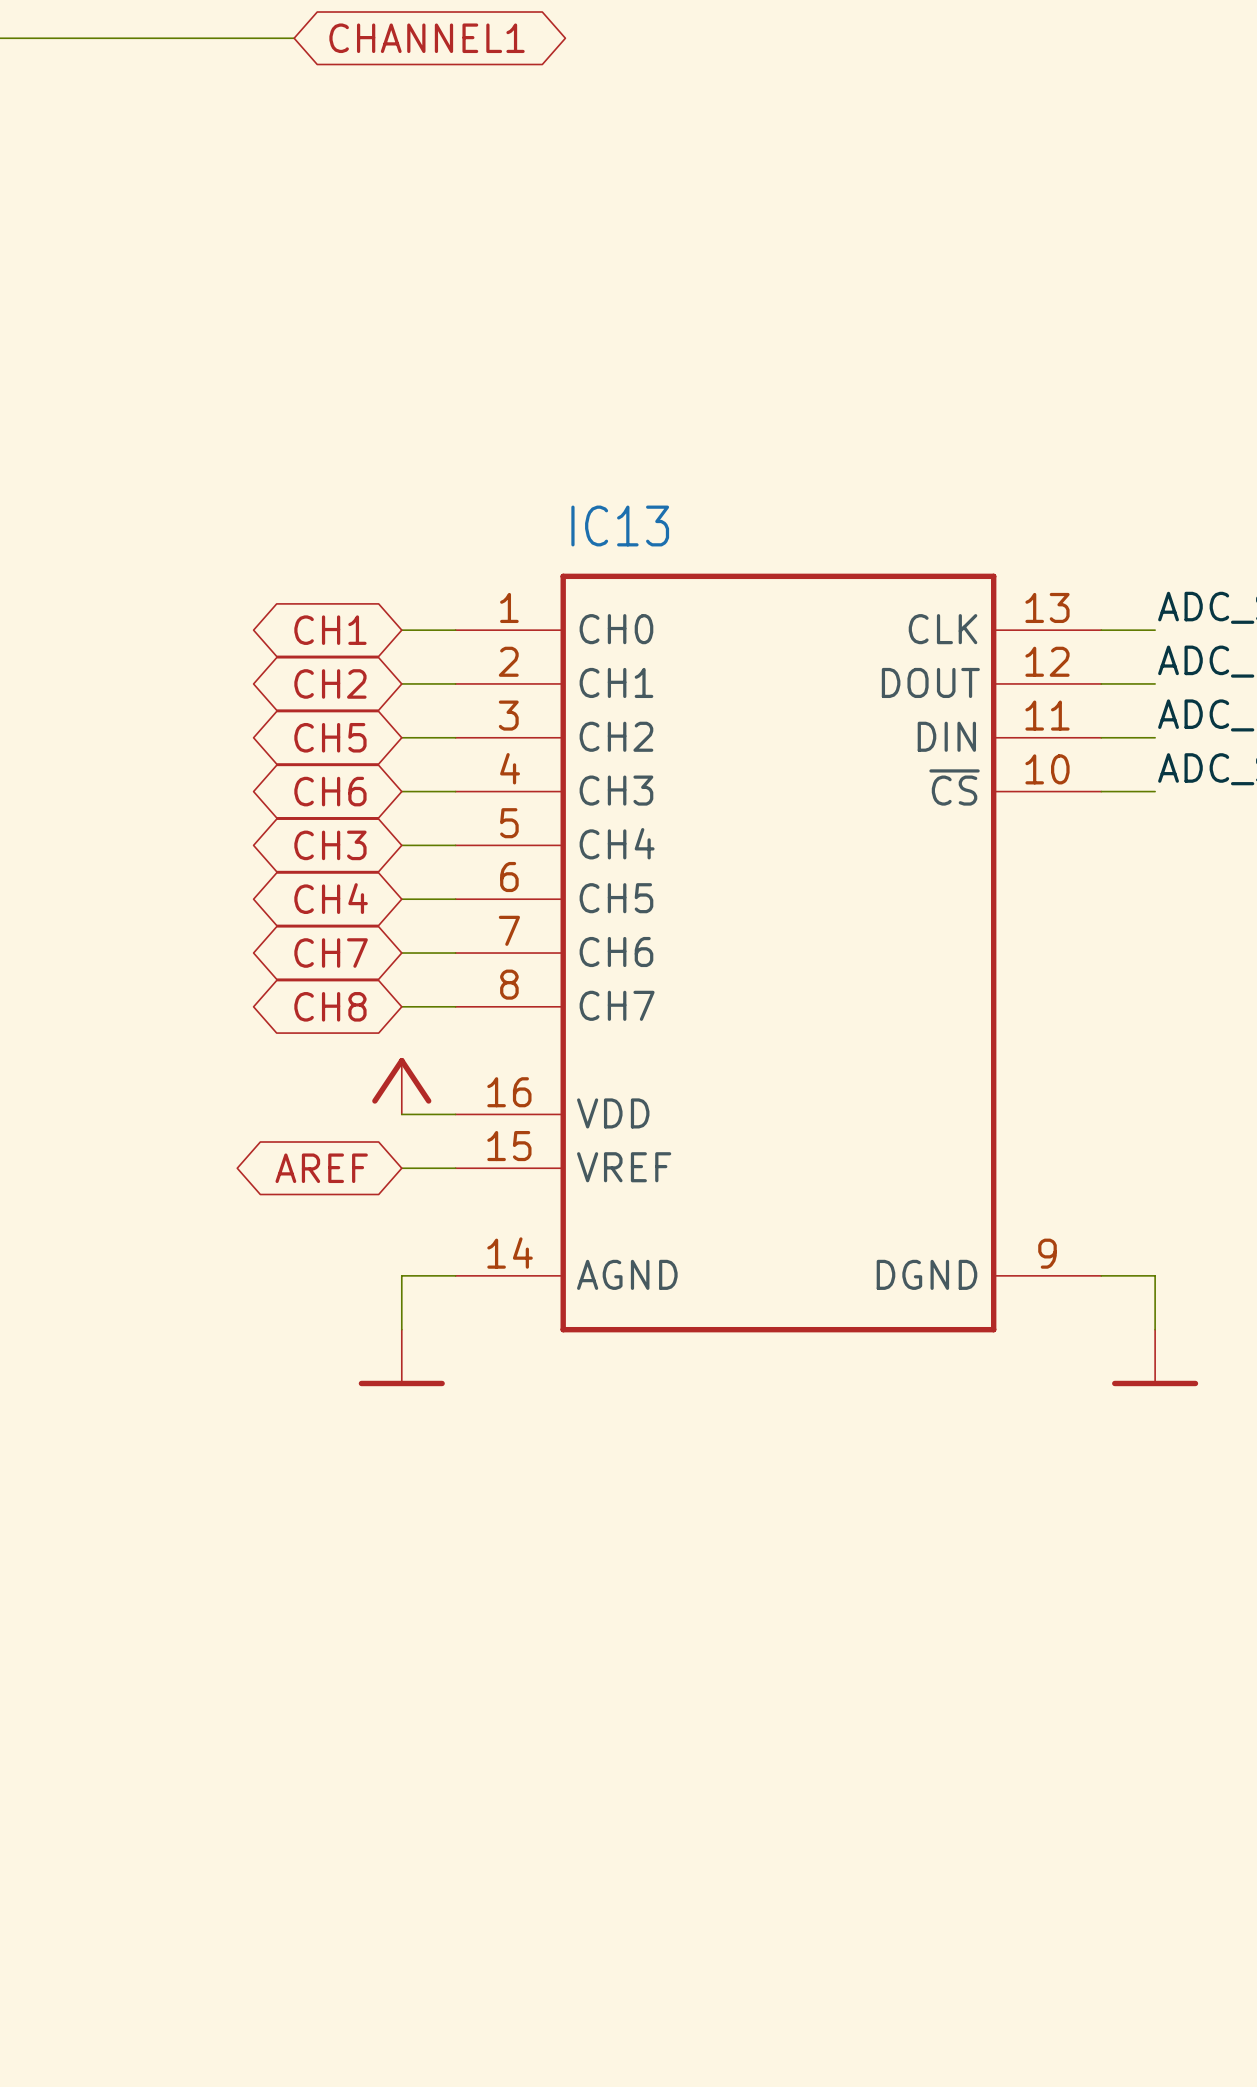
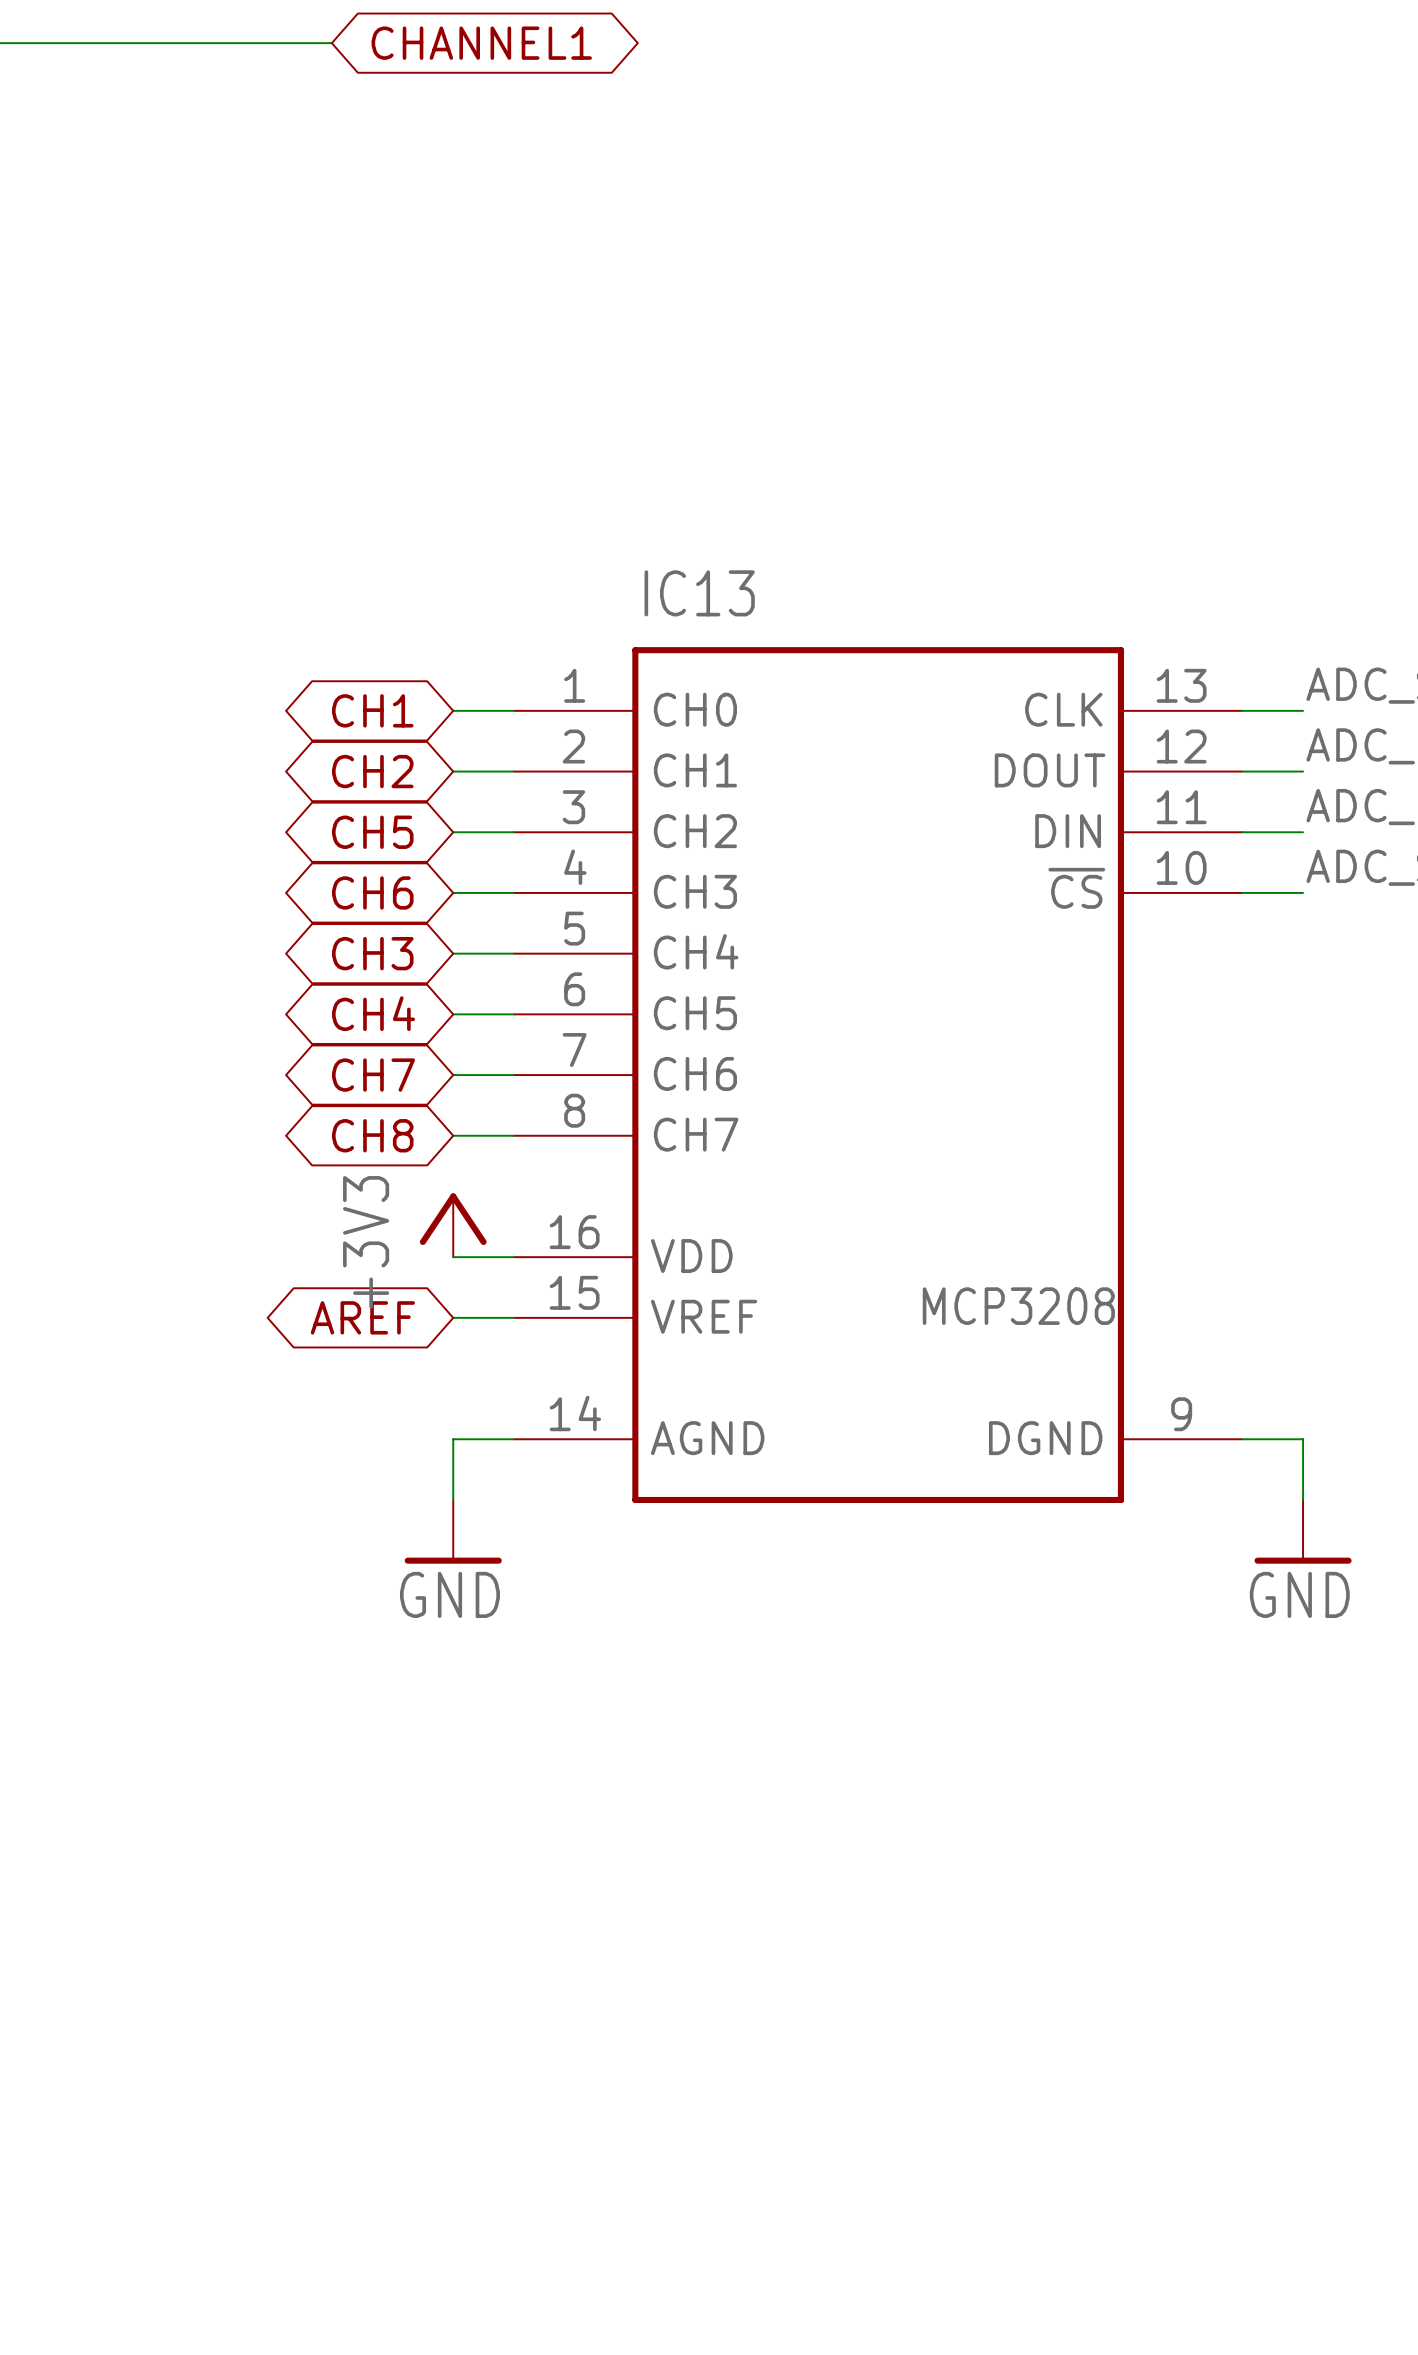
power symbol text: none -> +3V3 (366, 1242)
IC13 value: none -> MCP3208 (1018, 1306)
power symbol text: none -> GND (449, 1594)
power symbol text: none -> GND (1299, 1594)

